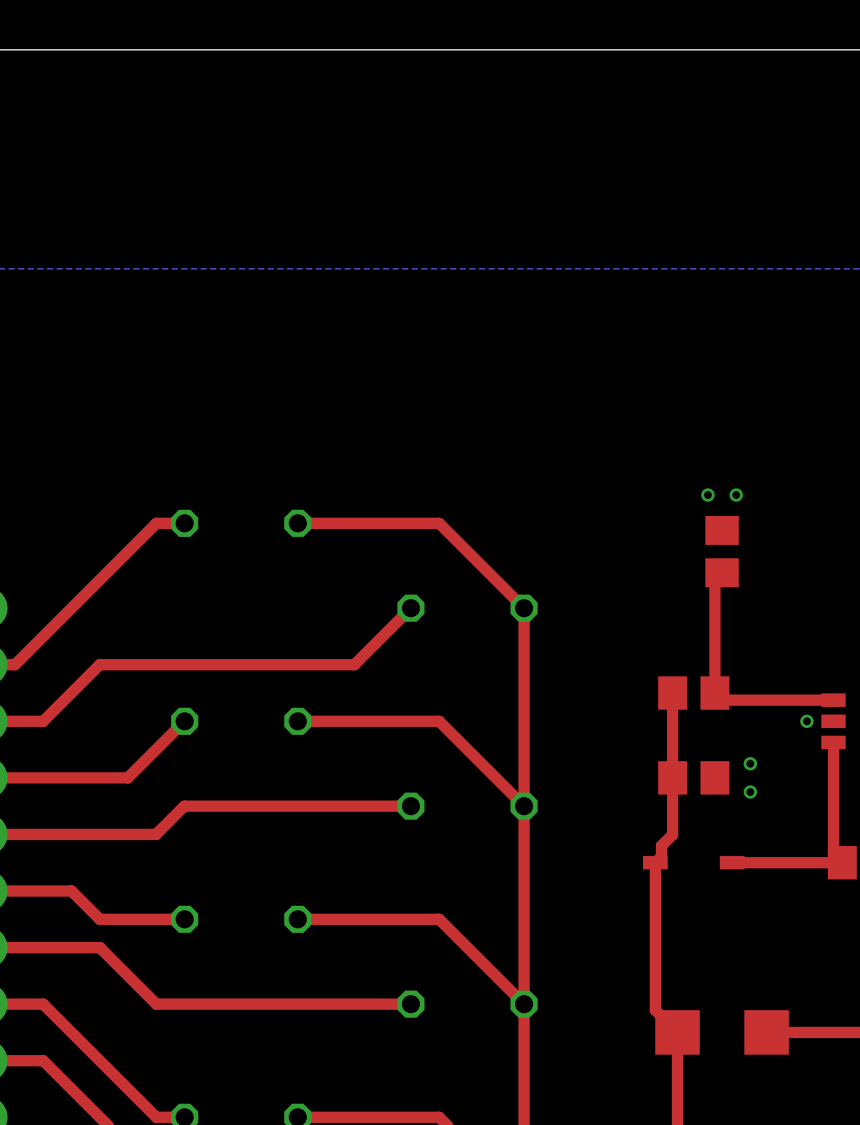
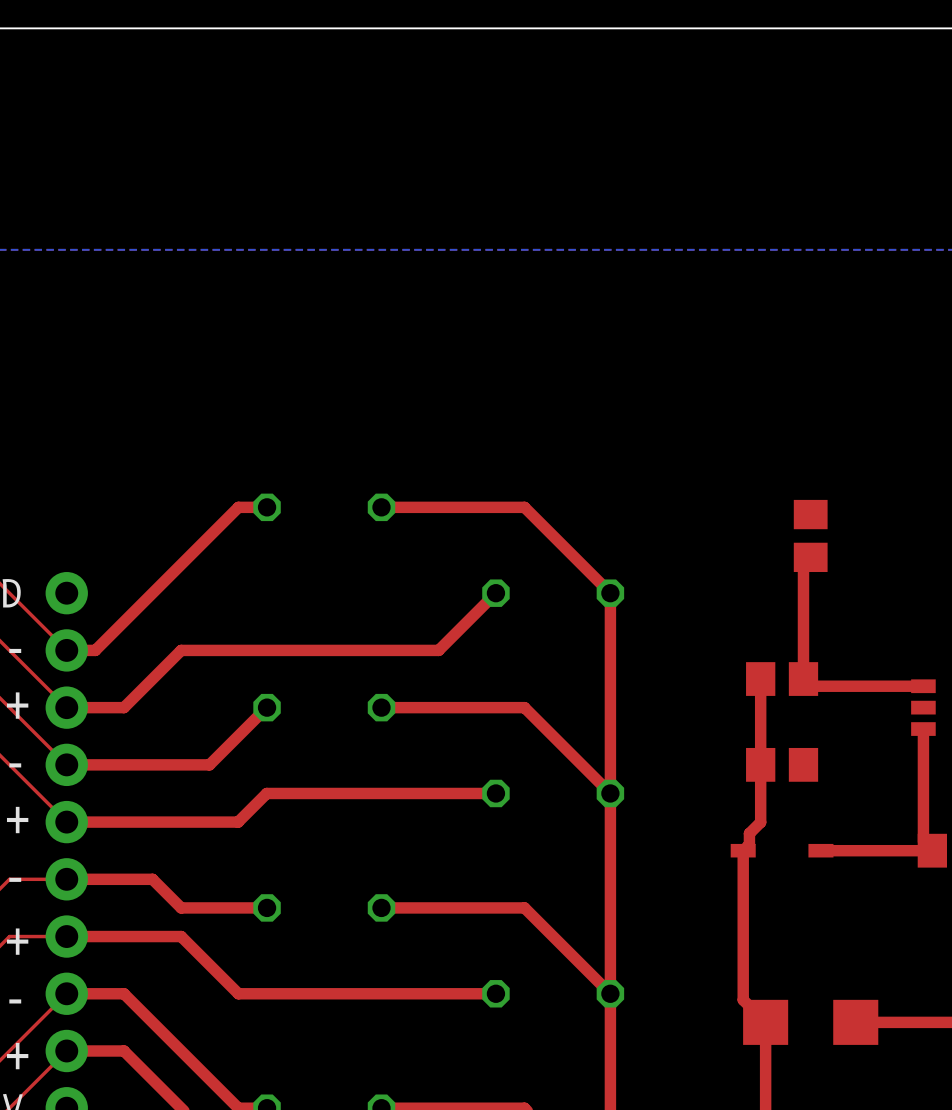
via: (707, 495) -> none
via: (736, 495) -> none
via: (806, 721) -> none
via: (750, 763) -> none
via: (750, 792) -> none

